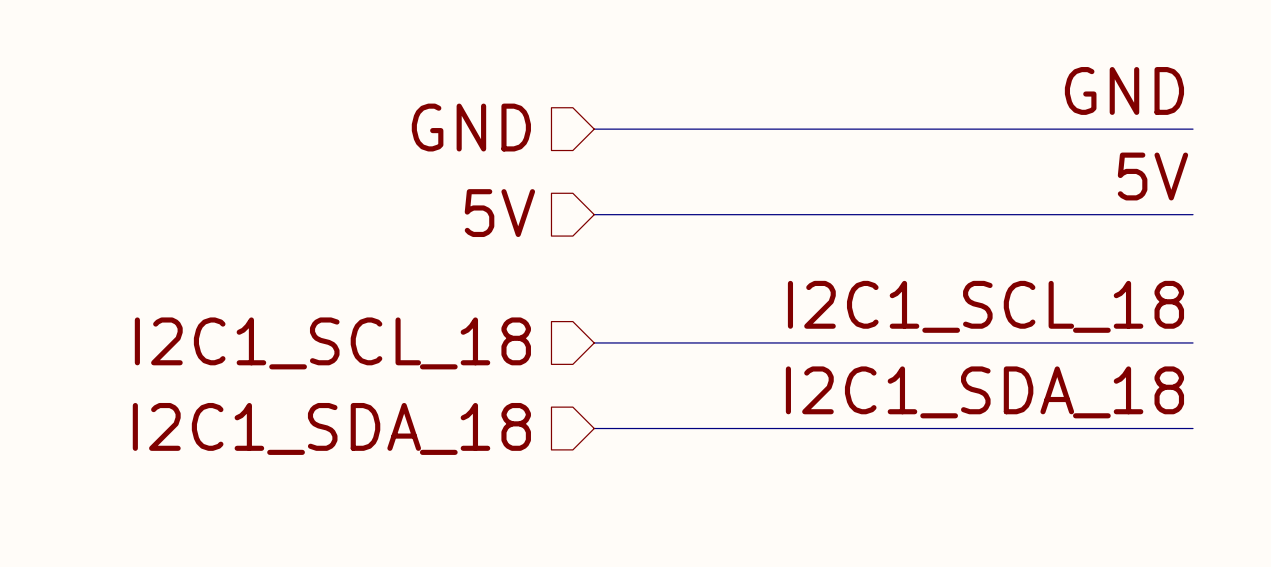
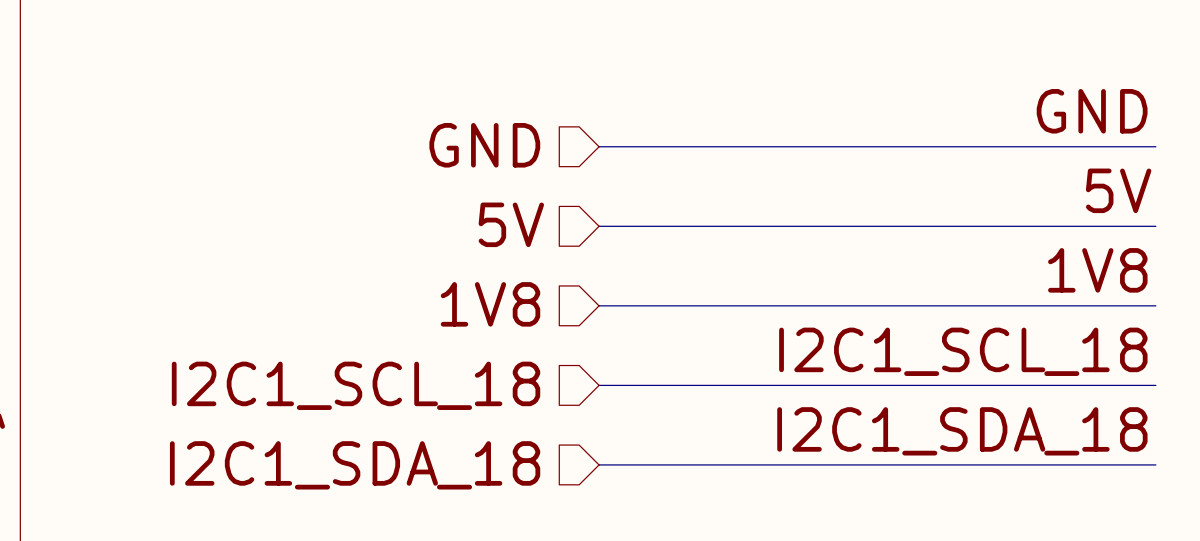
label: none -> 1V8 (1097, 270)
hierarchical label: none -> 1V8 (490, 304)
wire: none -> (599, 305) (1155, 305)
label position: I2C1_SCL_18 (985, 306) -> I2C1_SCL_18 (963, 351)
wire: (594, 342) (1193, 342) -> (599, 385) (1155, 385)
hierarchical label position: I2C1_SCL_18 (332, 343) -> I2C1_SCL_18 (356, 385)
label position: I2C1_SDA_18 (984, 392) -> I2C1_SDA_18 (962, 431)
hierarchical label position: I2C1_SDA_18 (331, 428) -> I2C1_SDA_18 (355, 465)
wire: (594, 428) (1193, 428) -> (599, 464) (1155, 464)

